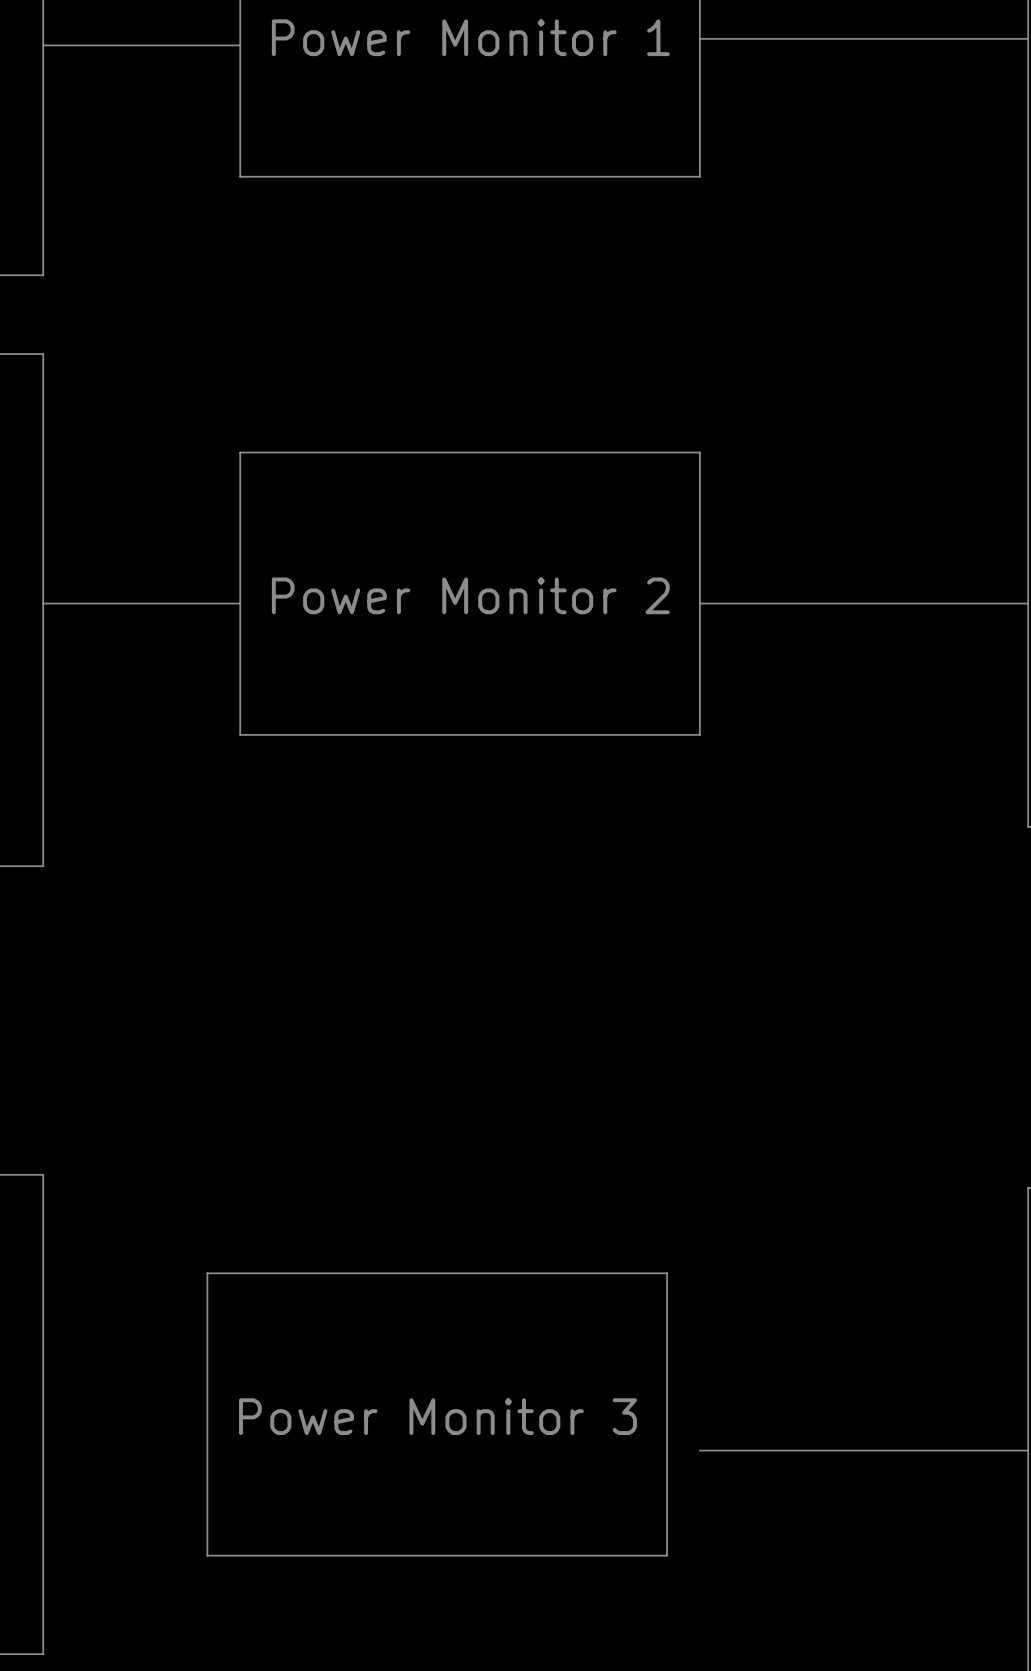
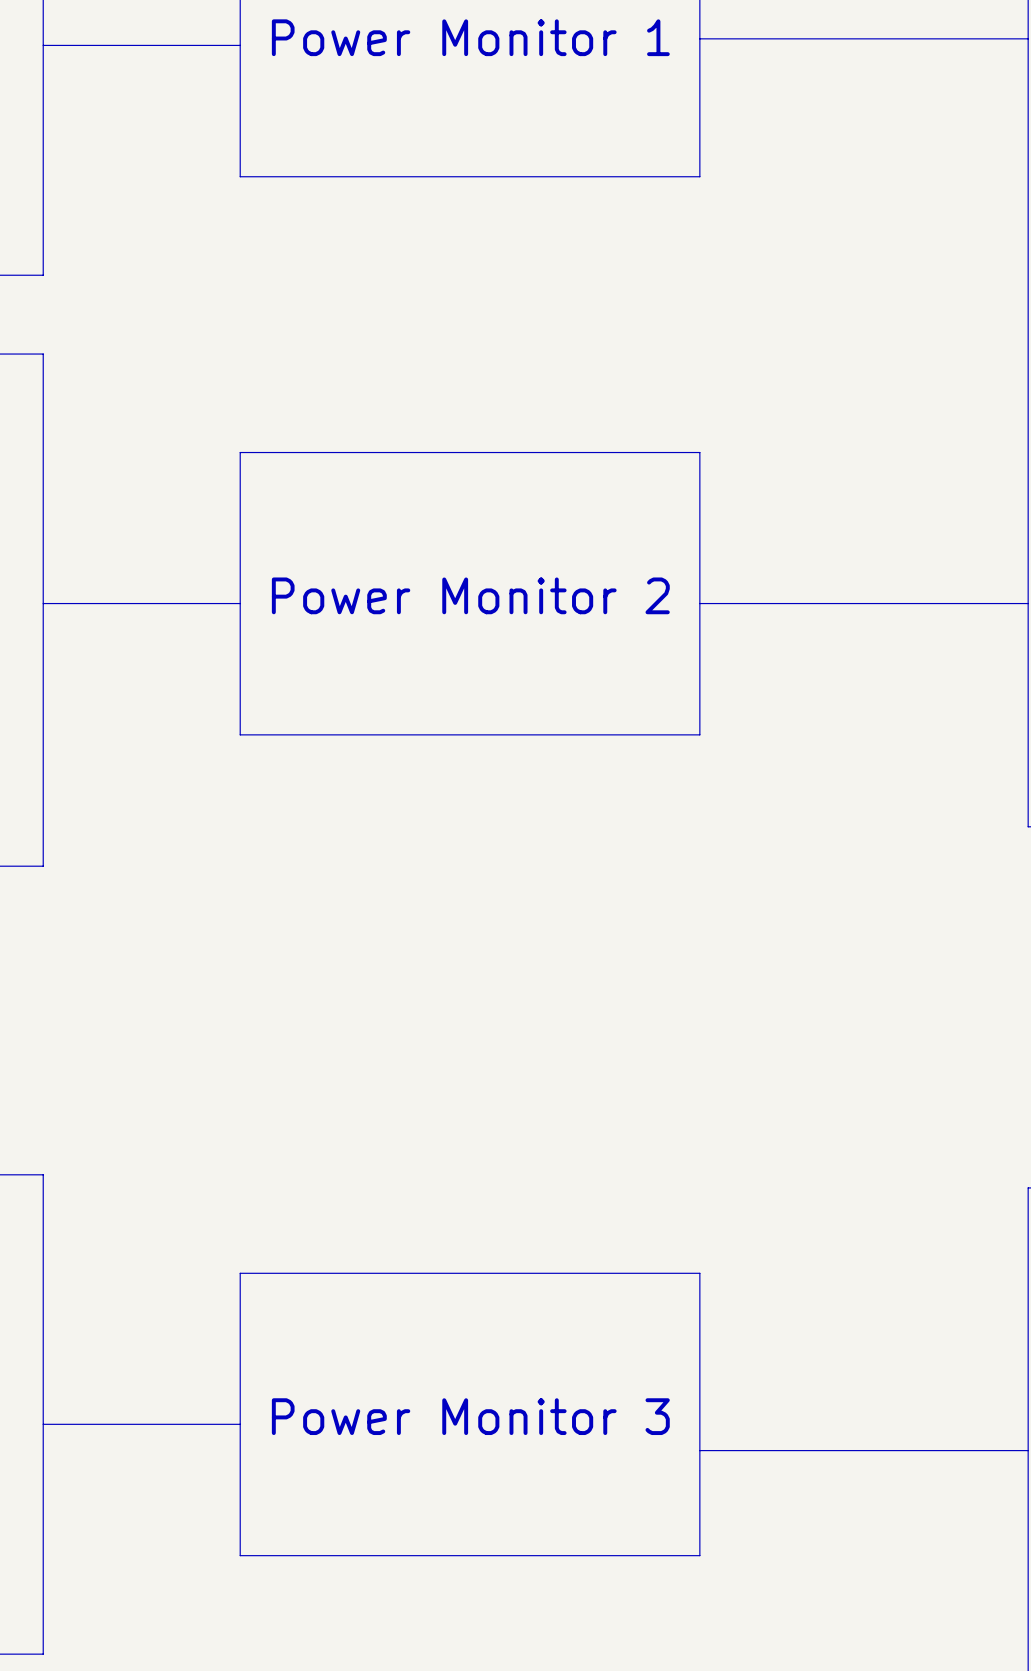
line: (240, 1273) (207, 1273) (207, 1555) (240, 1555) -> (240, 1273) (240, 1555)
line: (667, 1273) (667, 1555) -> (667, 1273) (699, 1273) (699, 1555) (667, 1555)
text position: Power Monitor 3 (437, 1416) -> Power Monitor 3 (470, 1416)
line: none -> (43, 1424) (240, 1424)

